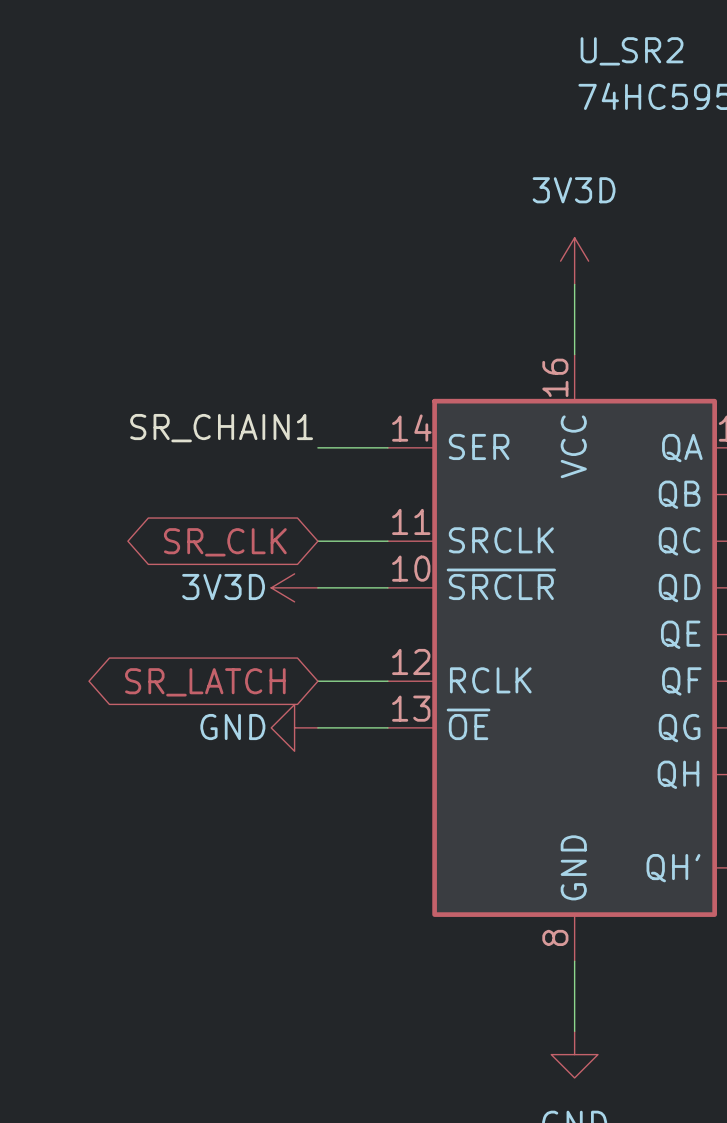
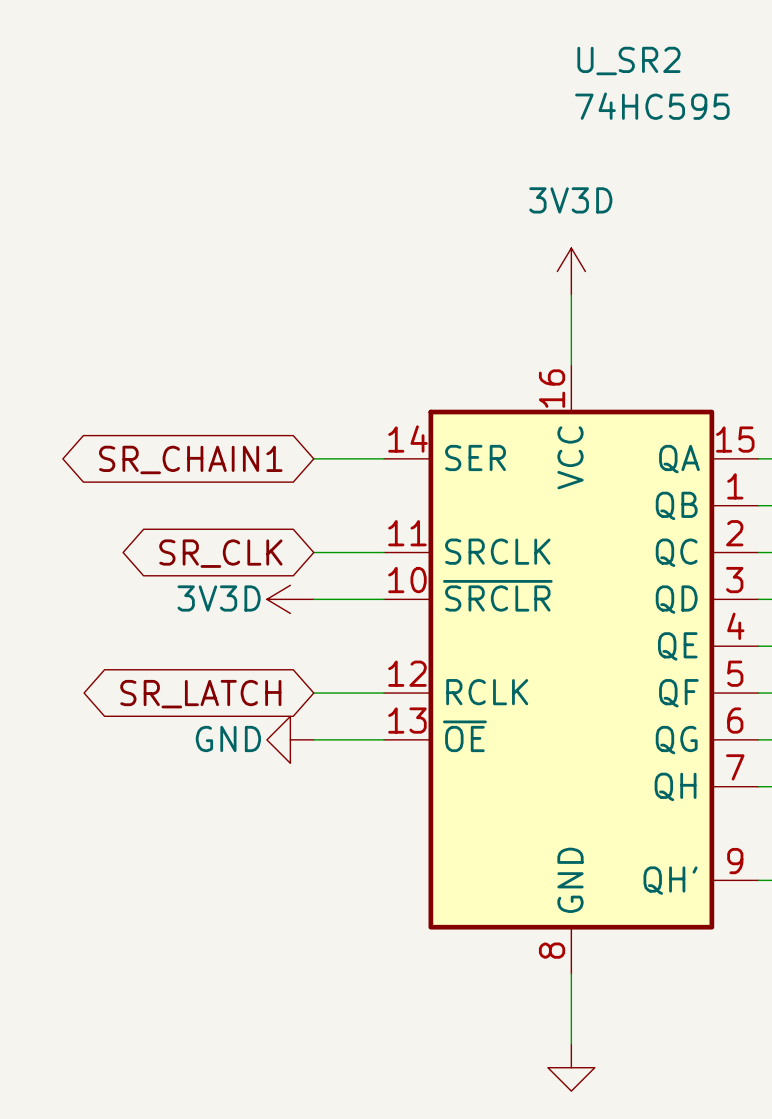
label: SR_CHAIN1 (221, 428) -> none
global label: none -> SR_CHAIN1 (190, 459)

